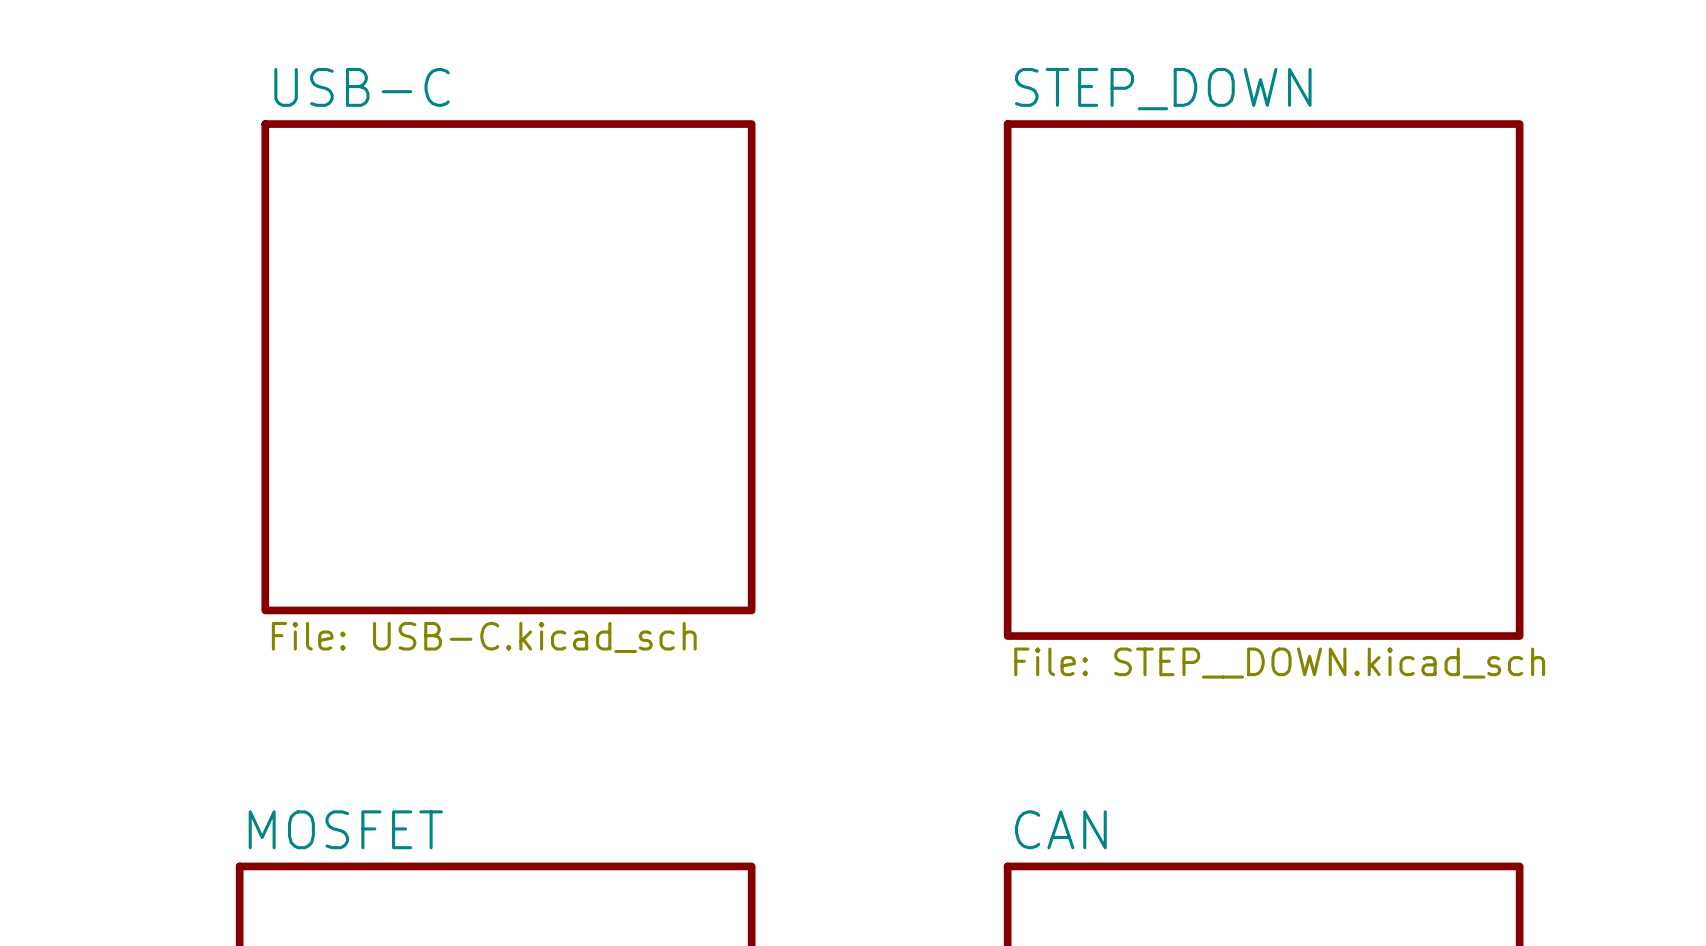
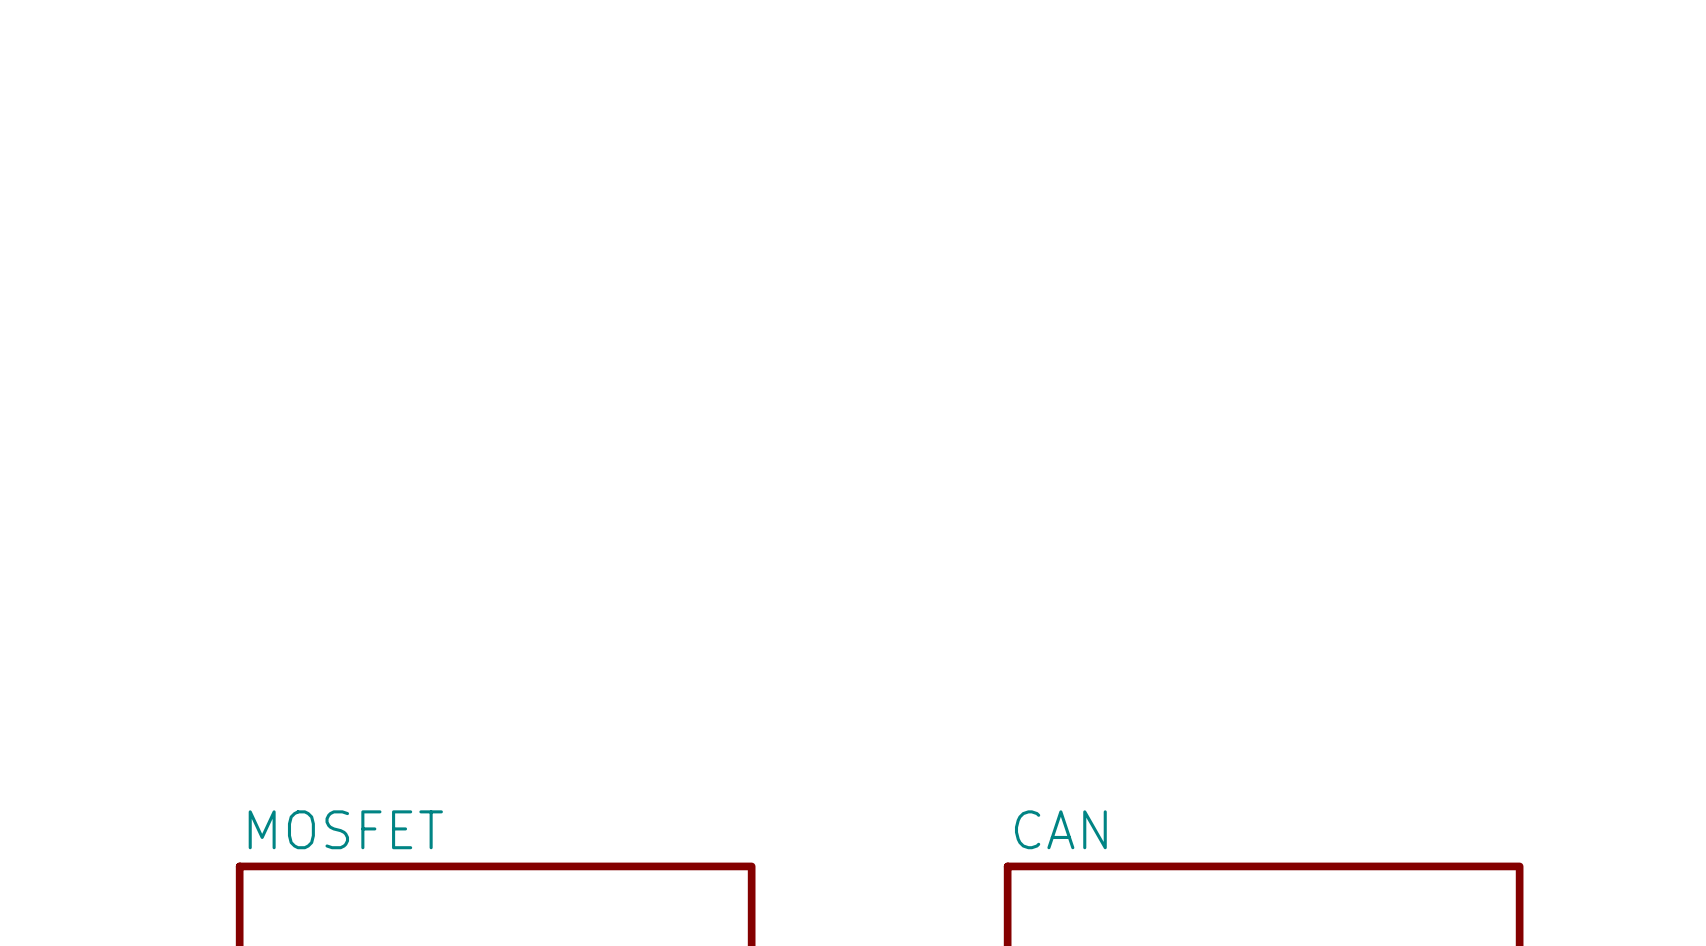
sheet USB-C: File: USB-C.kicad_sch (508, 367) -> none
sheet STEP_DOWN: File: STEP__DOWN.kicad_sch (1263, 380) -> none

